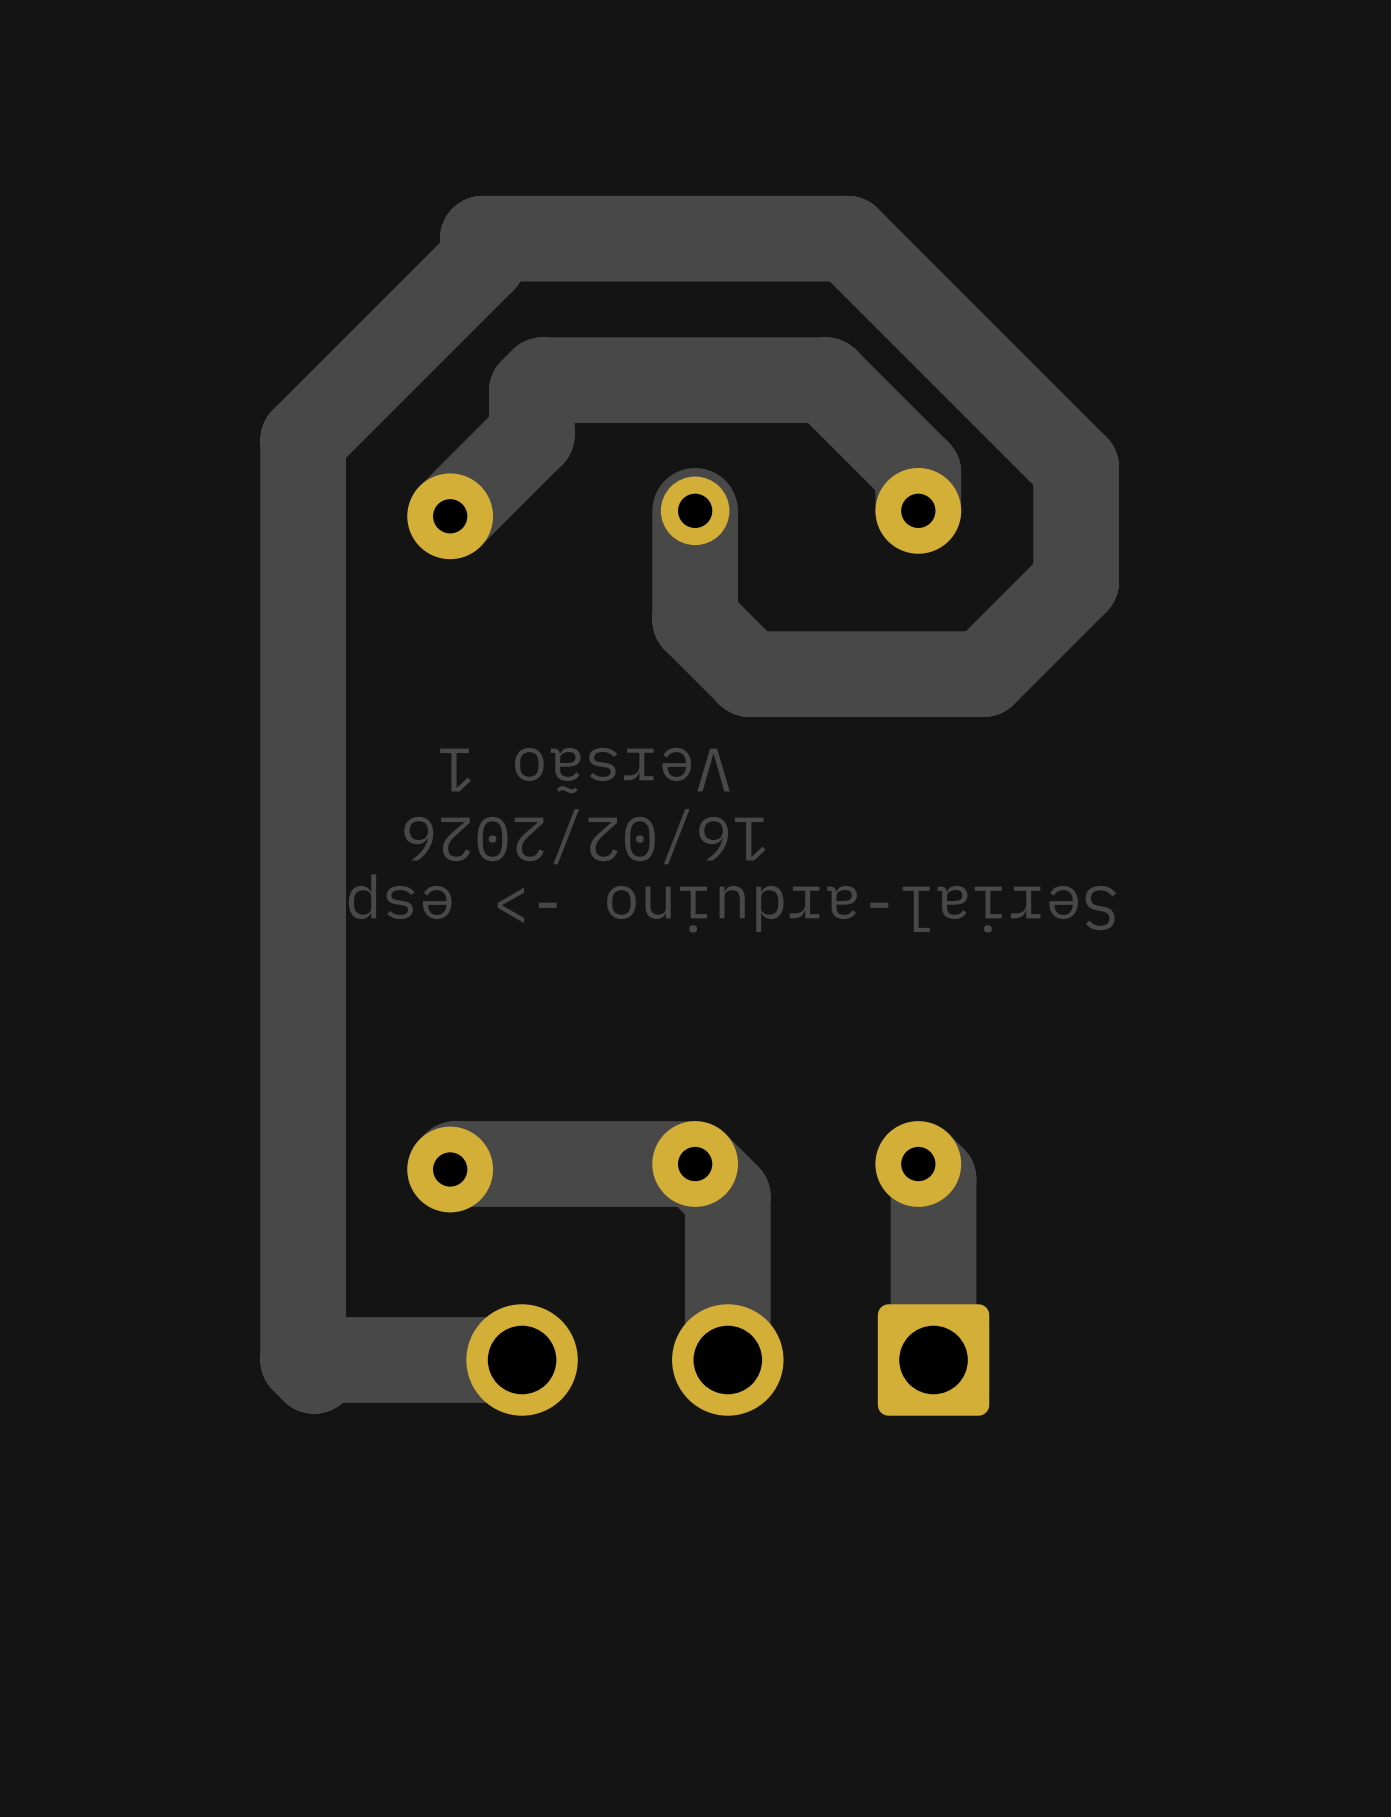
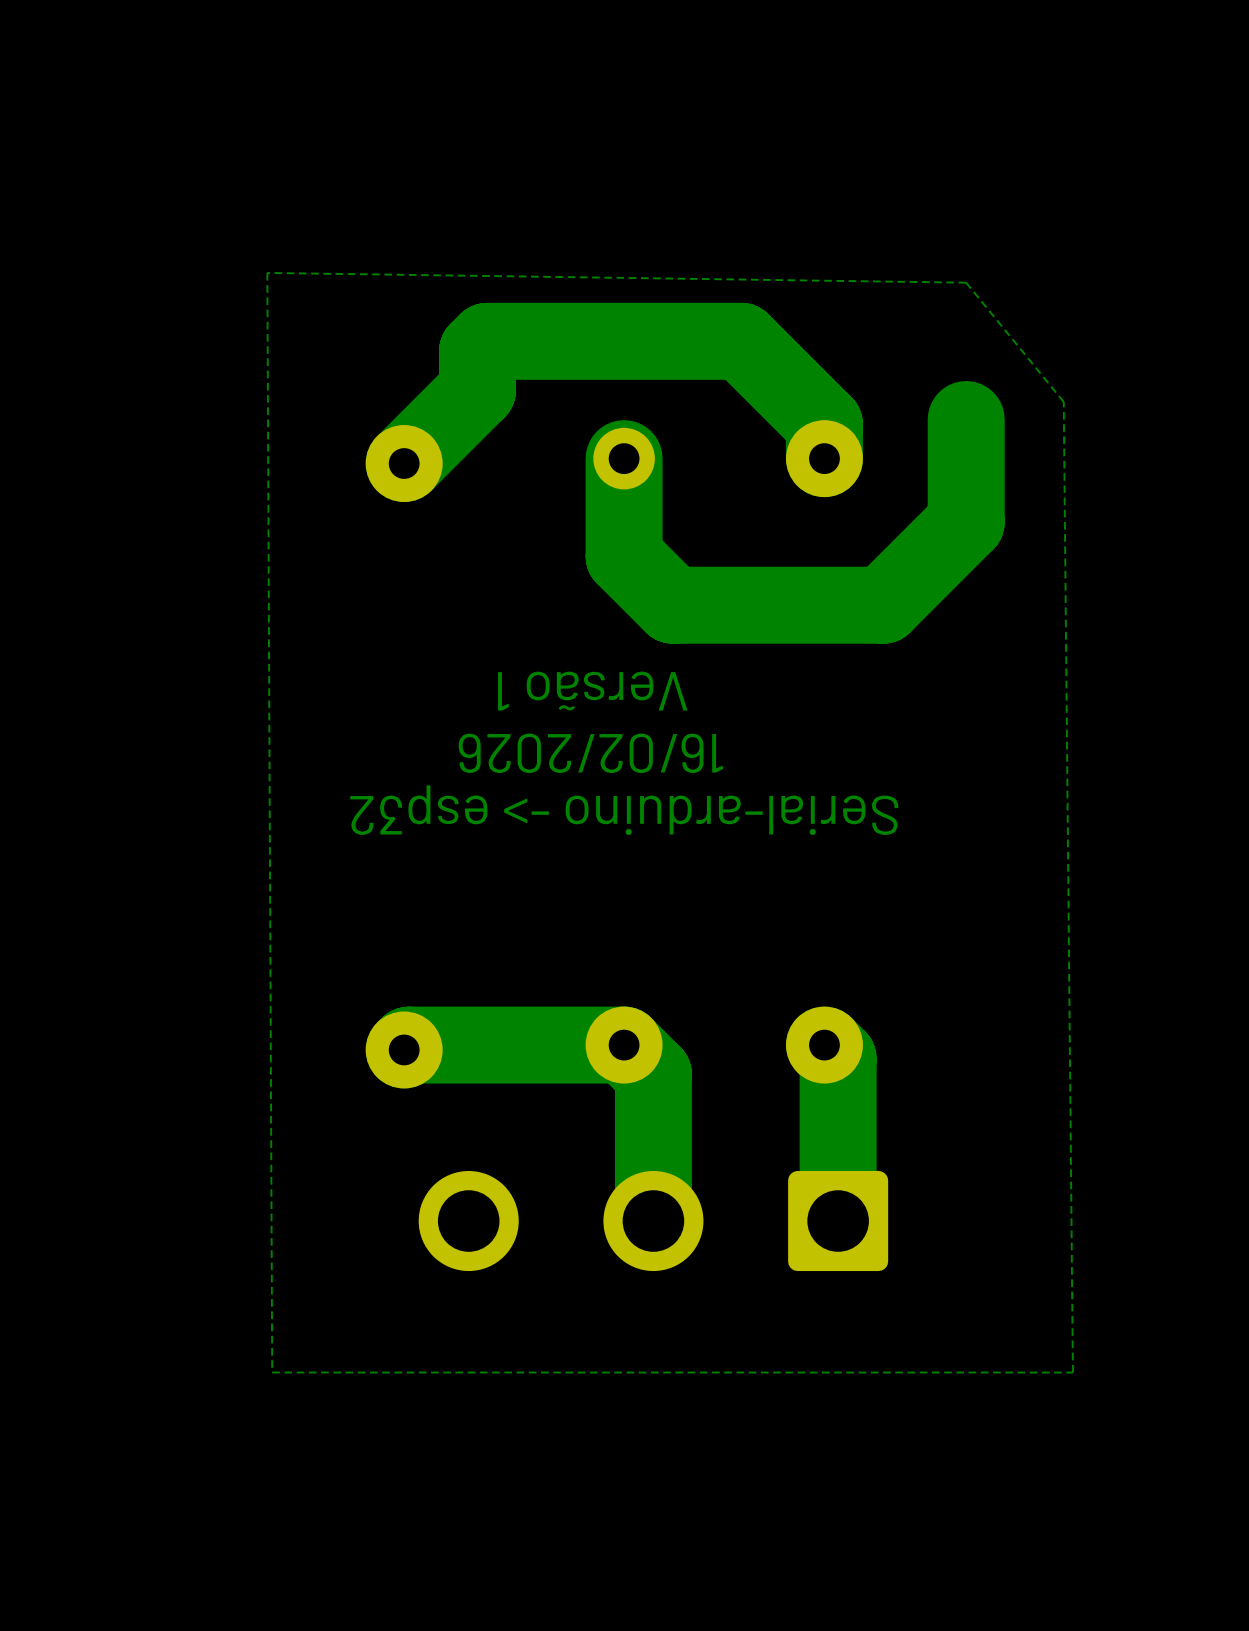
zone outline: none -> (267, 272) (966, 282) (1063, 401) (1072, 1372) (272, 1372) (267, 272)
track: (1076, 467) (847, 238) (482, 238) (482, 260) (303, 440) (303, 1359) (314, 1370) (324, 1359) (522, 1359) -> none

